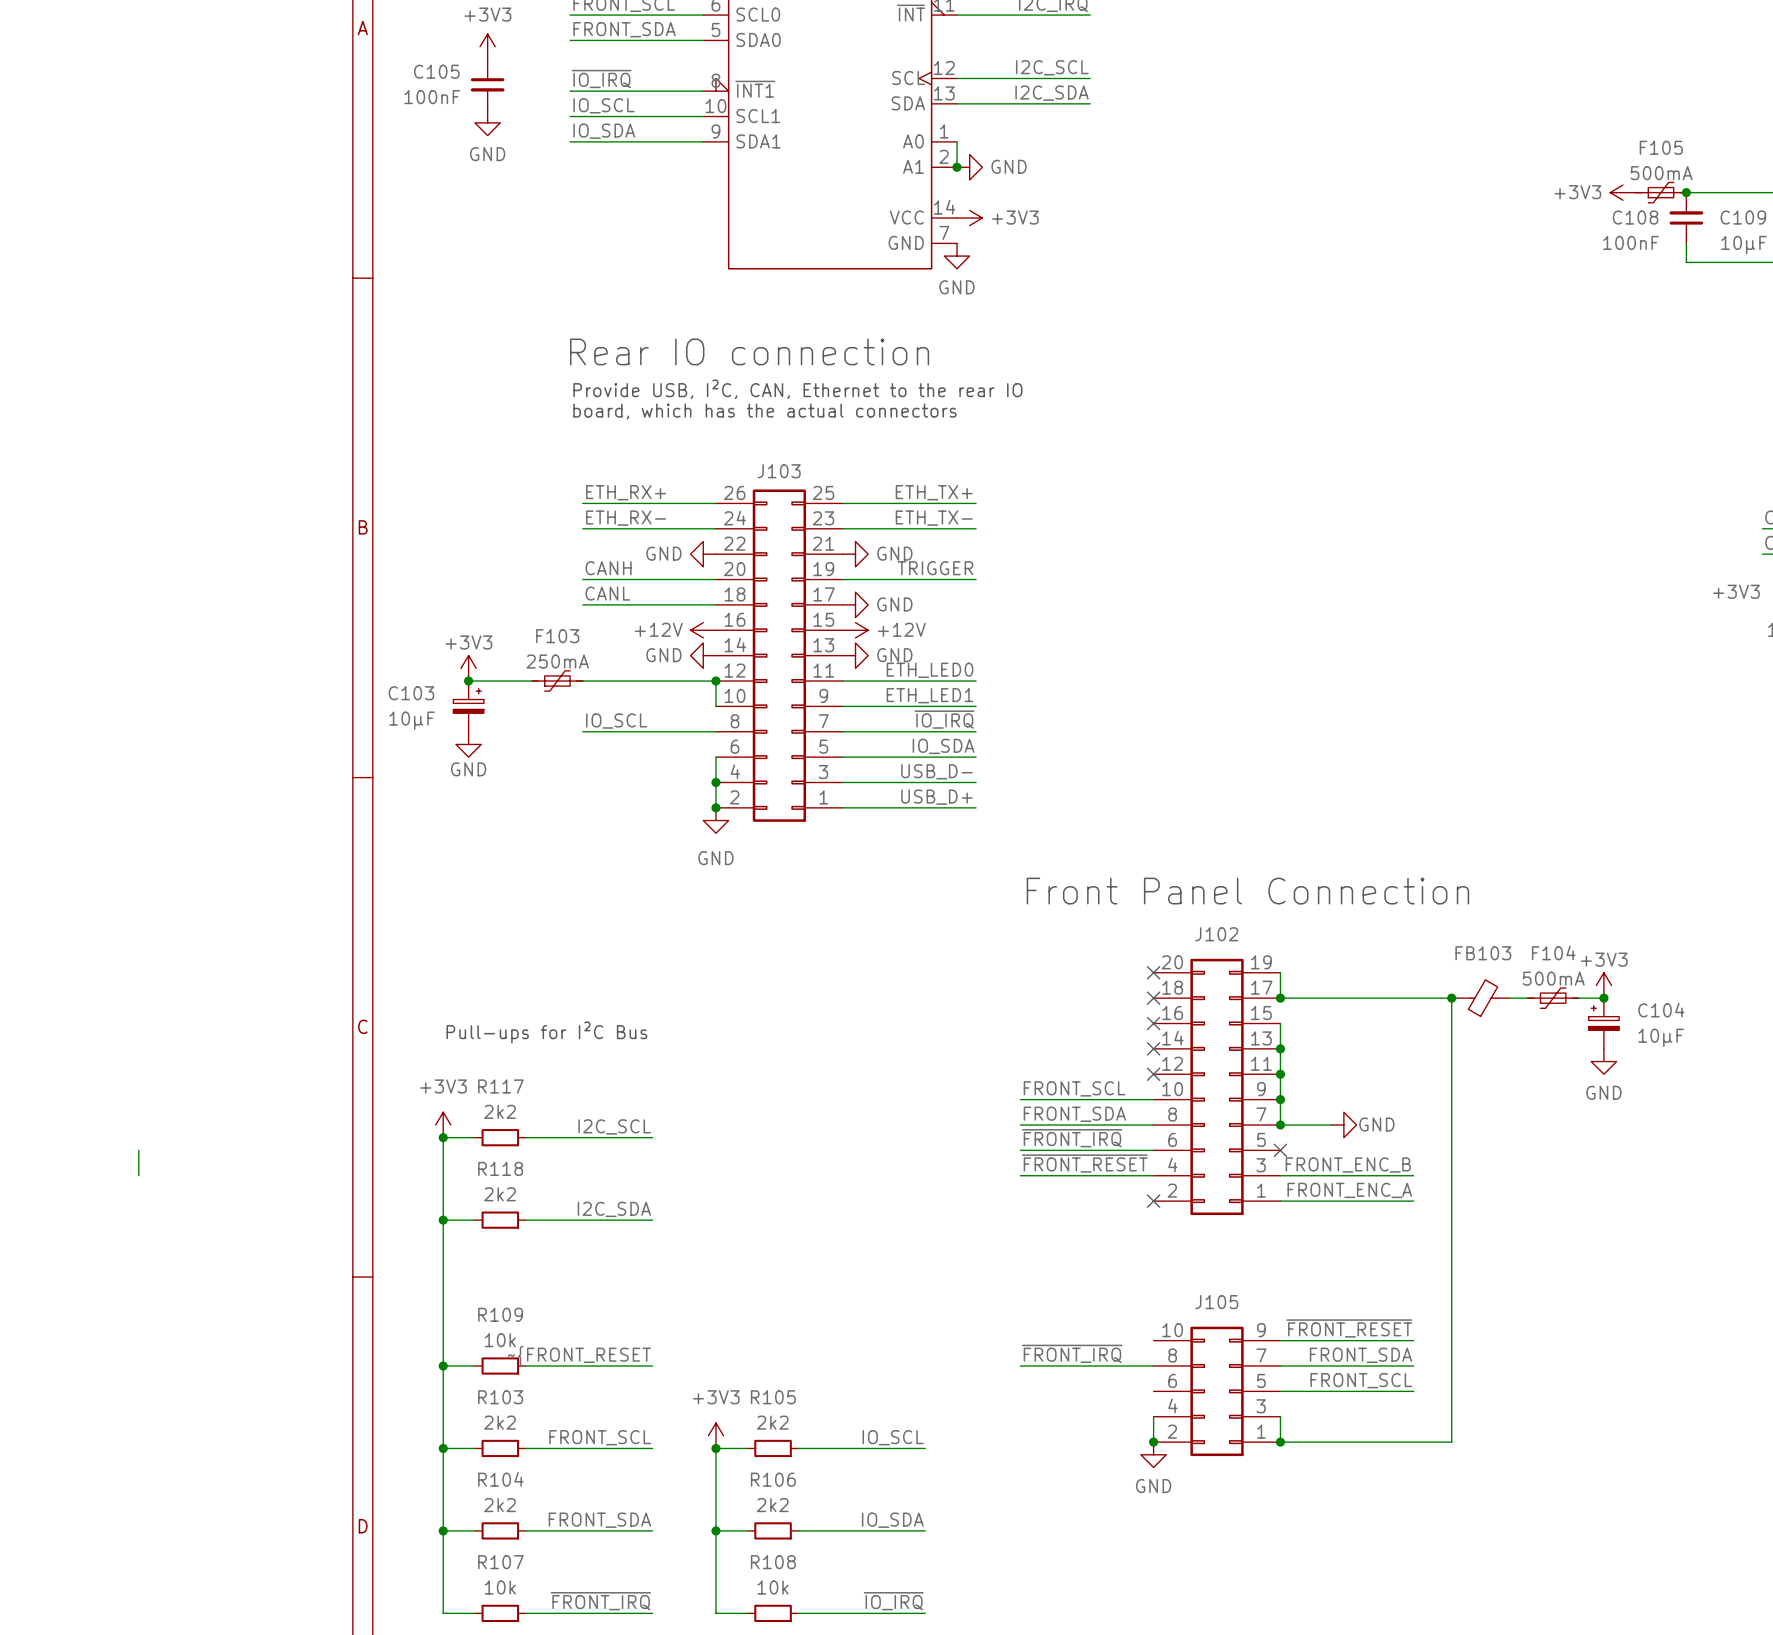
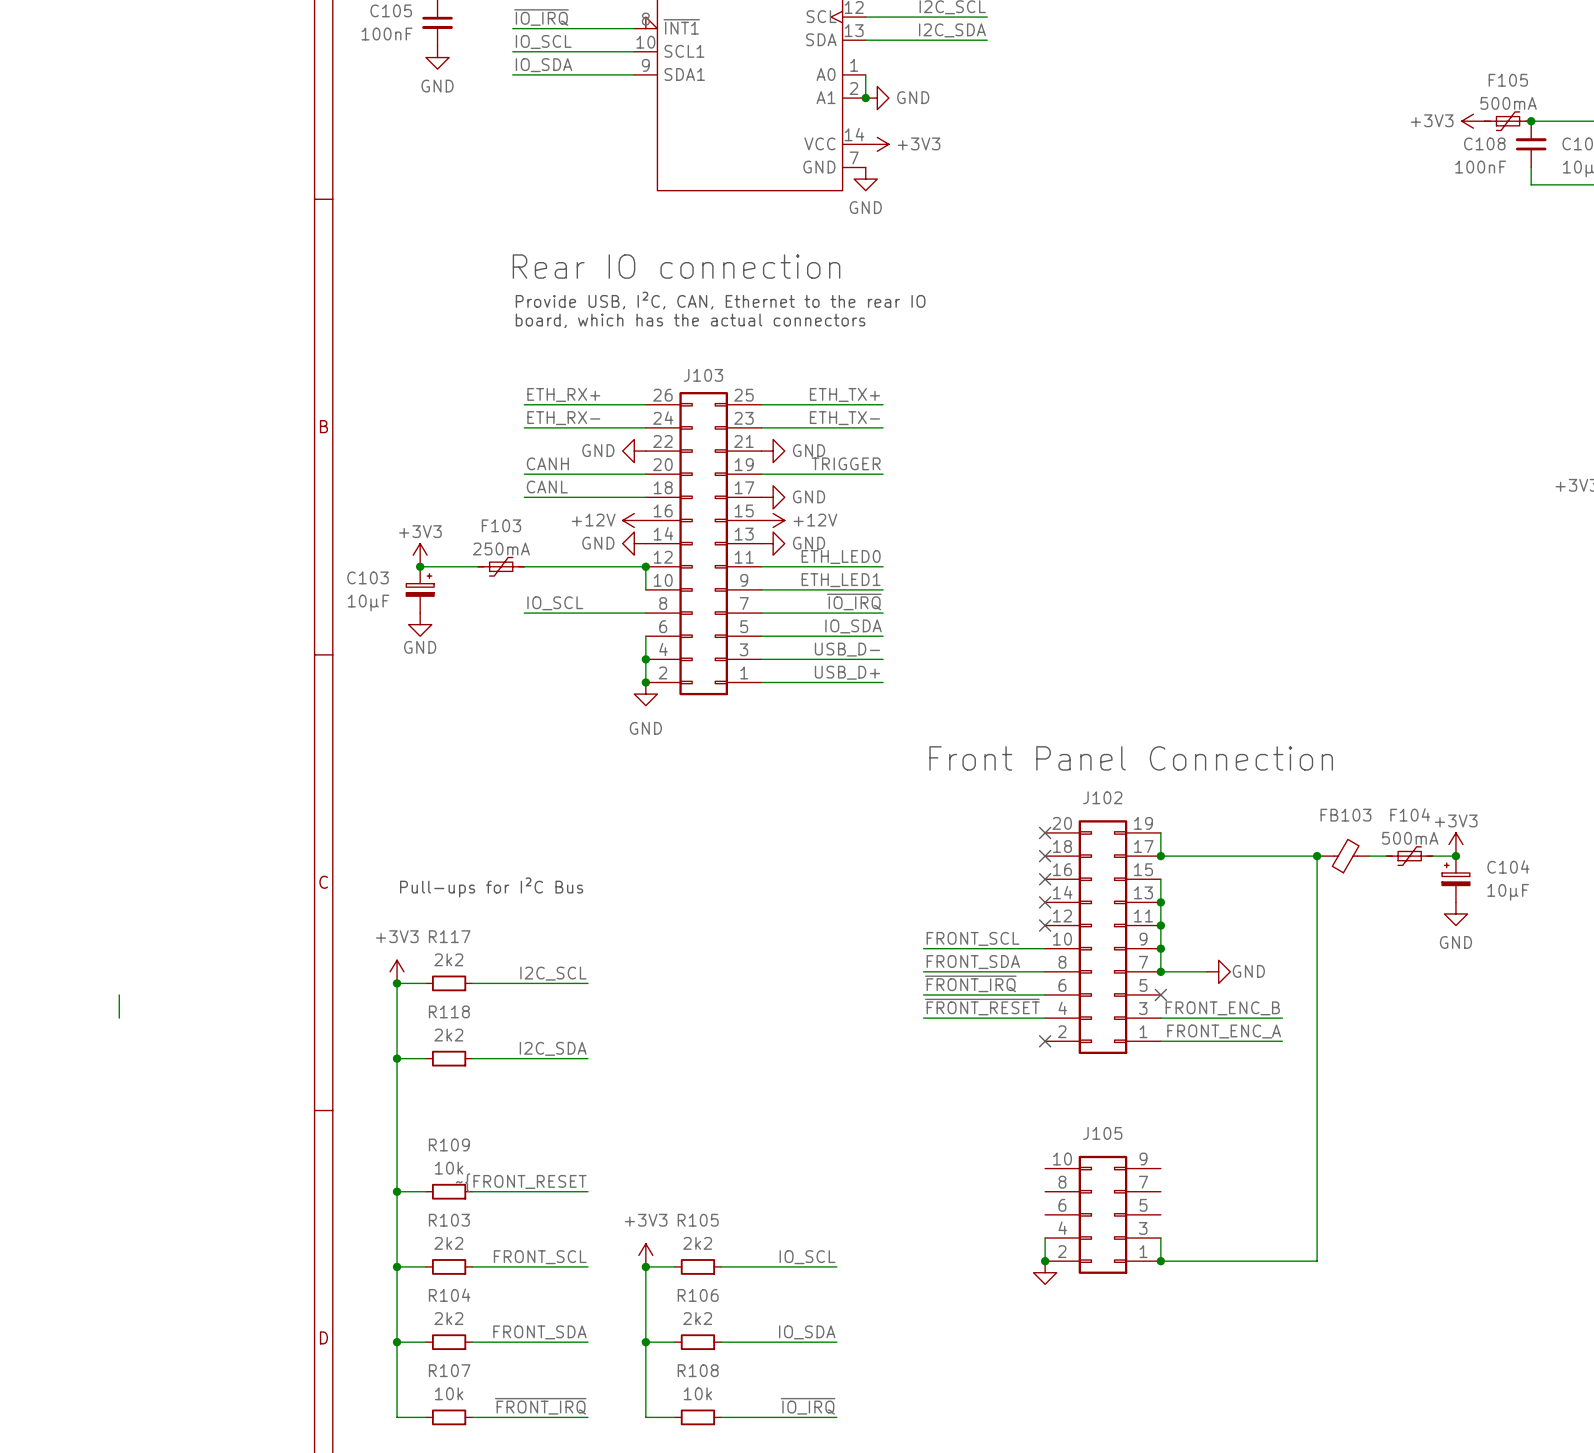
label: ~{FRONT_RESET} (1349, 1328) -> none
wire: (1280, 1340) (1413, 1340) -> none
label: ~{FRONT_IRQ} (1072, 1353) -> none
label: FRONT_SDA (1361, 1355) -> none
wire: (1020, 1366) (1153, 1366) -> none
wire: (1280, 1366) (1413, 1366) -> none
label: FRONT_SCL (1361, 1380) -> none
wire: (1280, 1391) (1413, 1391) -> none
power symbol text: GND (1153, 1486) -> none

